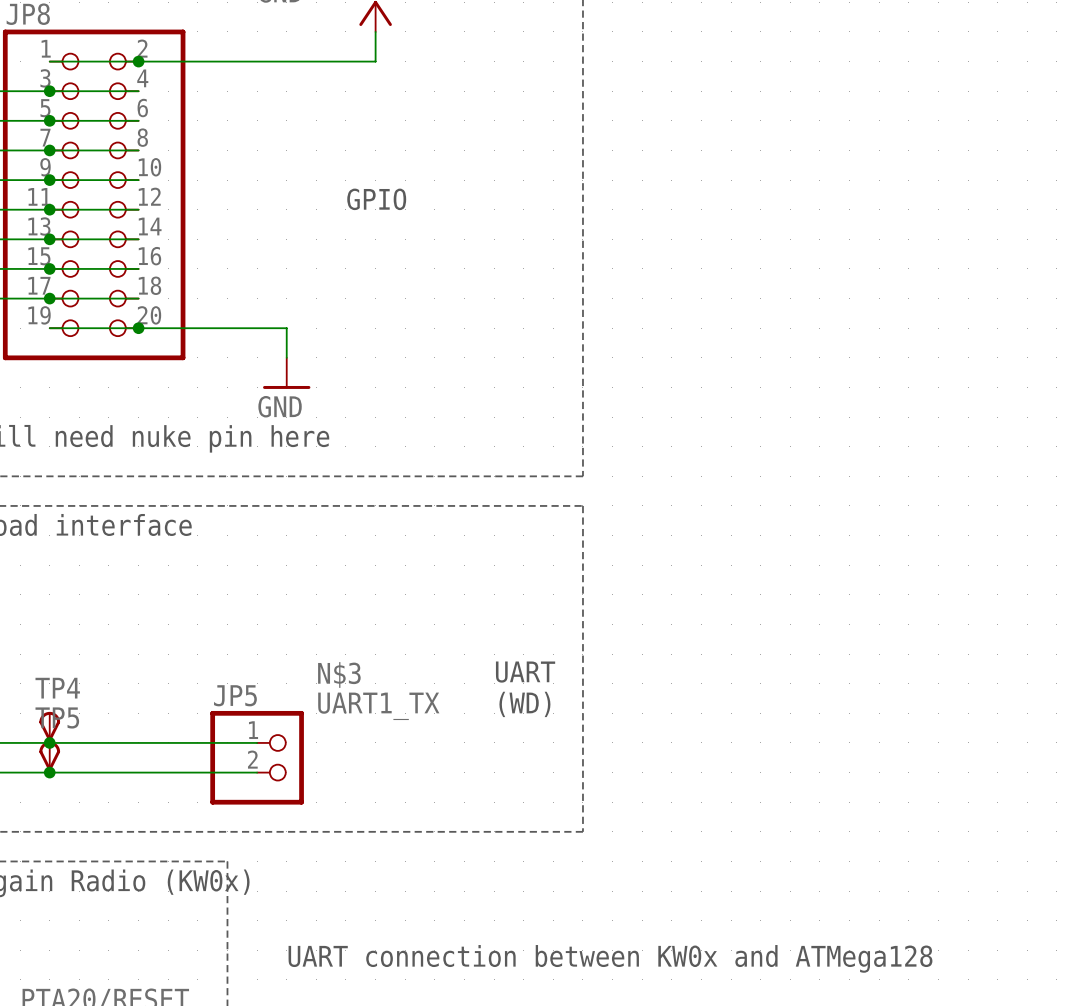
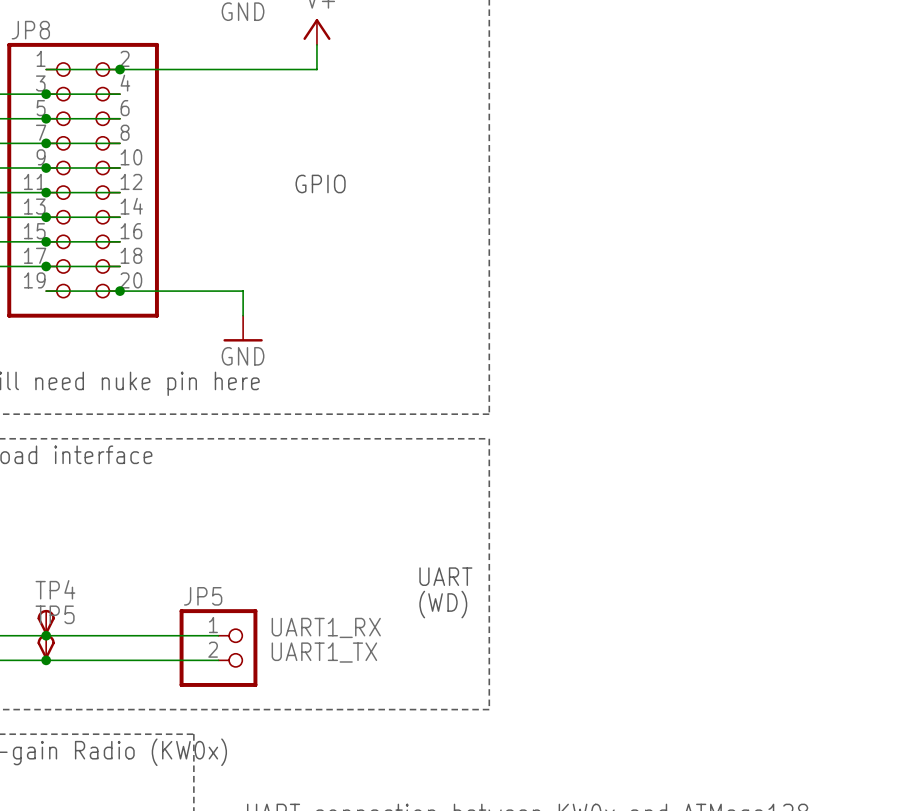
label: N$3 (339, 675) -> none
label position: UART1_TX (378, 706) -> UART1_TX (324, 652)
label: none -> UART1_RX (326, 627)

